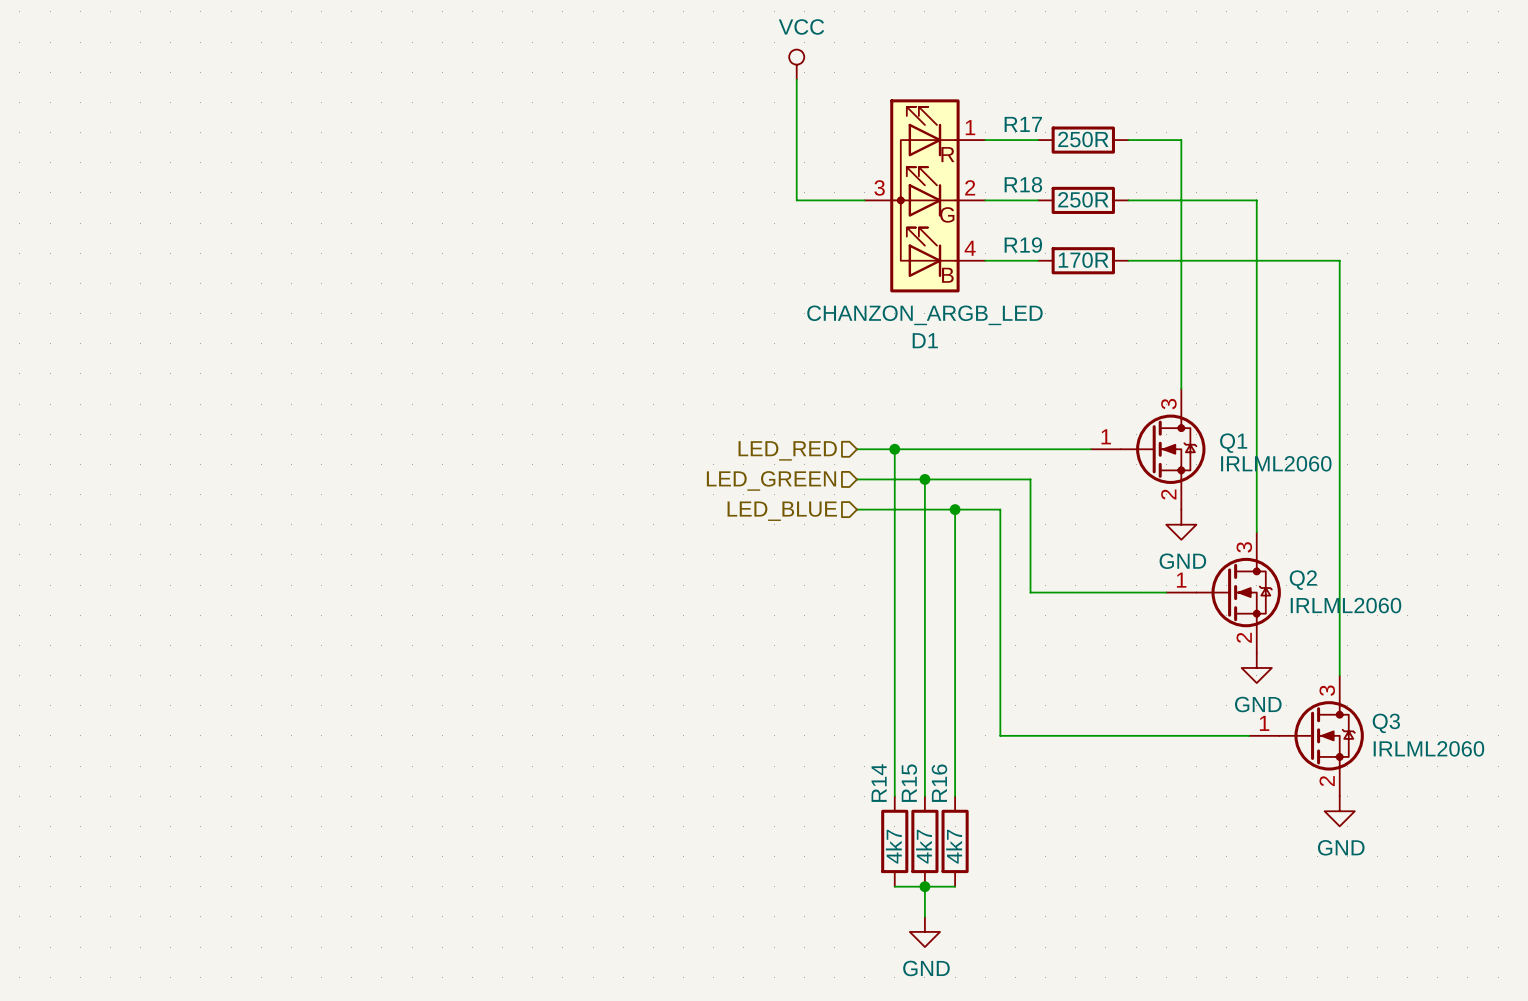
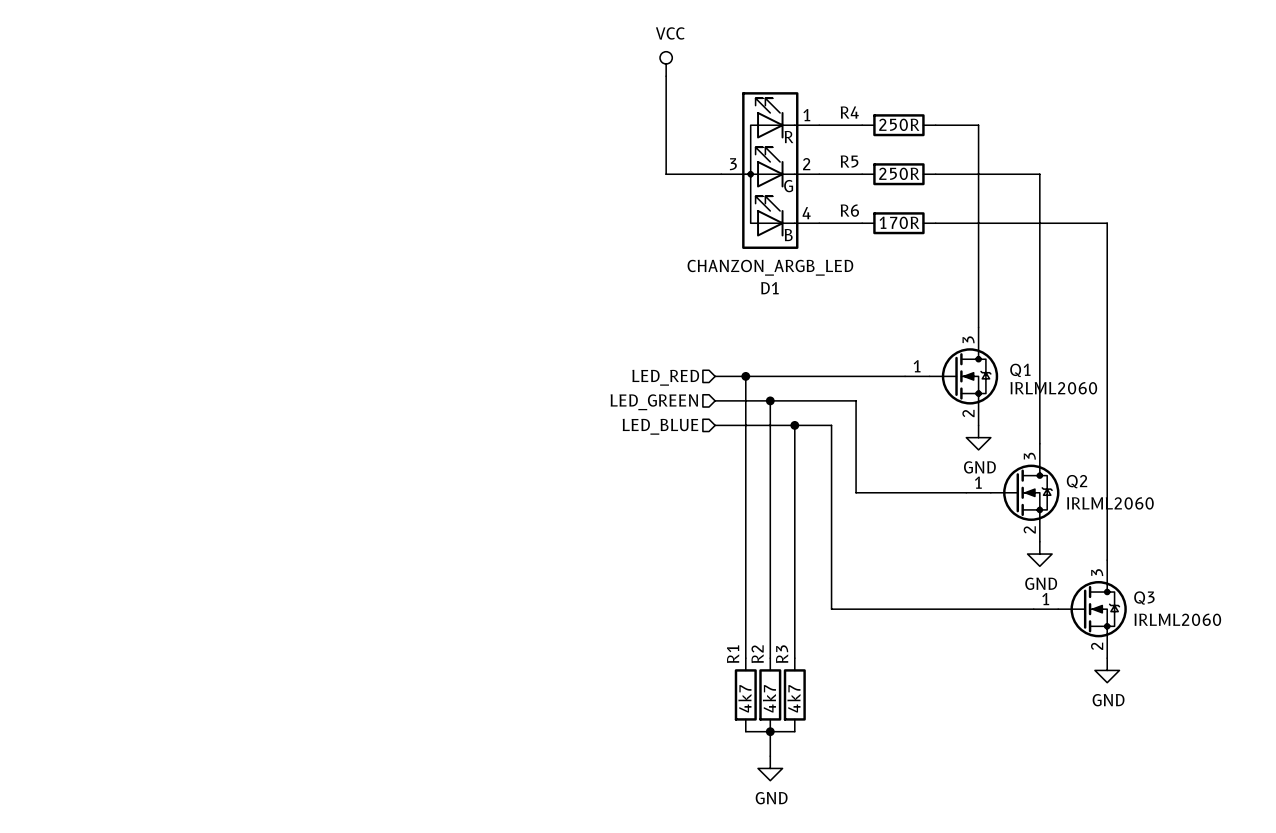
R17 name: R17 (1023, 124) -> R4 (849, 112)
R18 name: R18 (1023, 184) -> R5 (849, 161)
R19 name: R19 (1023, 245) -> R6 (849, 210)
R14 name: R14 (879, 783) -> R1 (733, 654)
R15 name: R15 (909, 783) -> R2 (757, 654)
R16 name: R16 (939, 783) -> R3 (782, 654)

